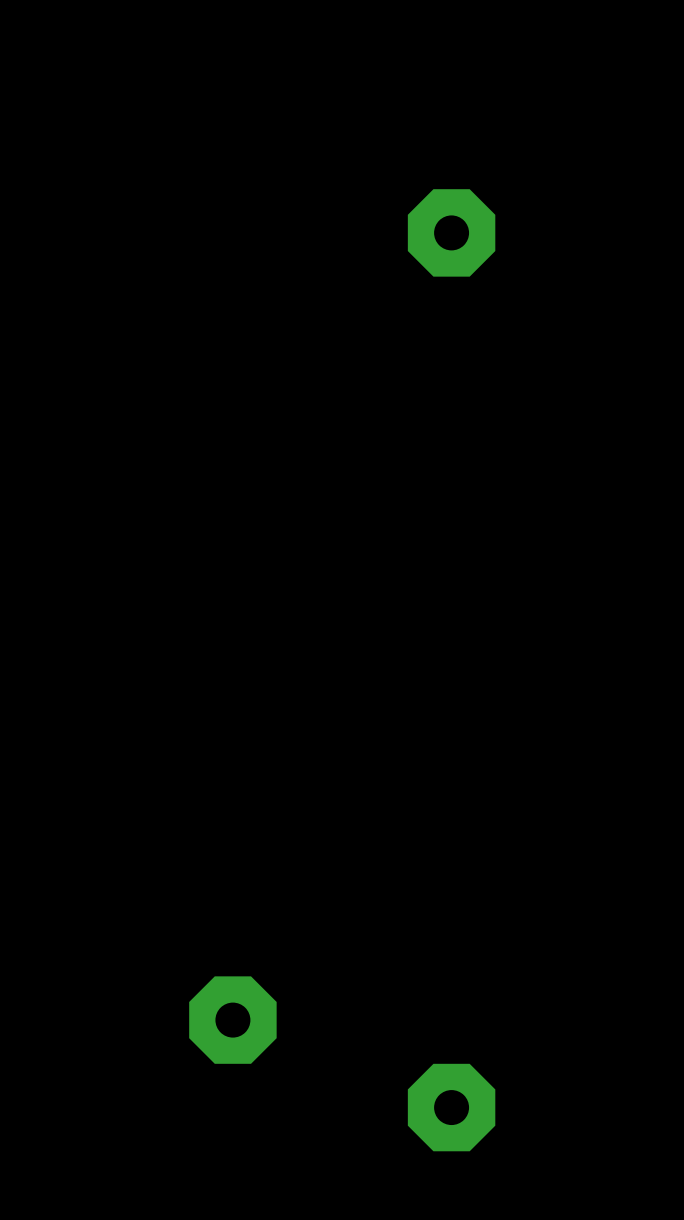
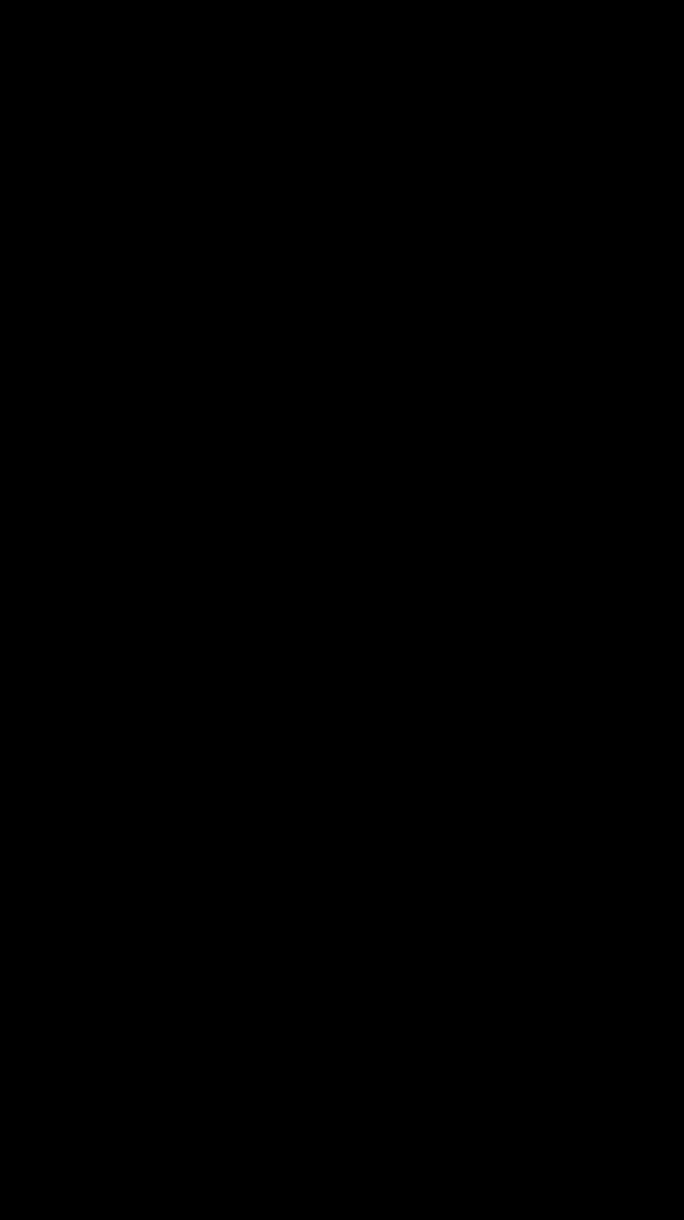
part: (451, 232) -> none
part: (232, 1020) -> none
part: (451, 1107) -> none

